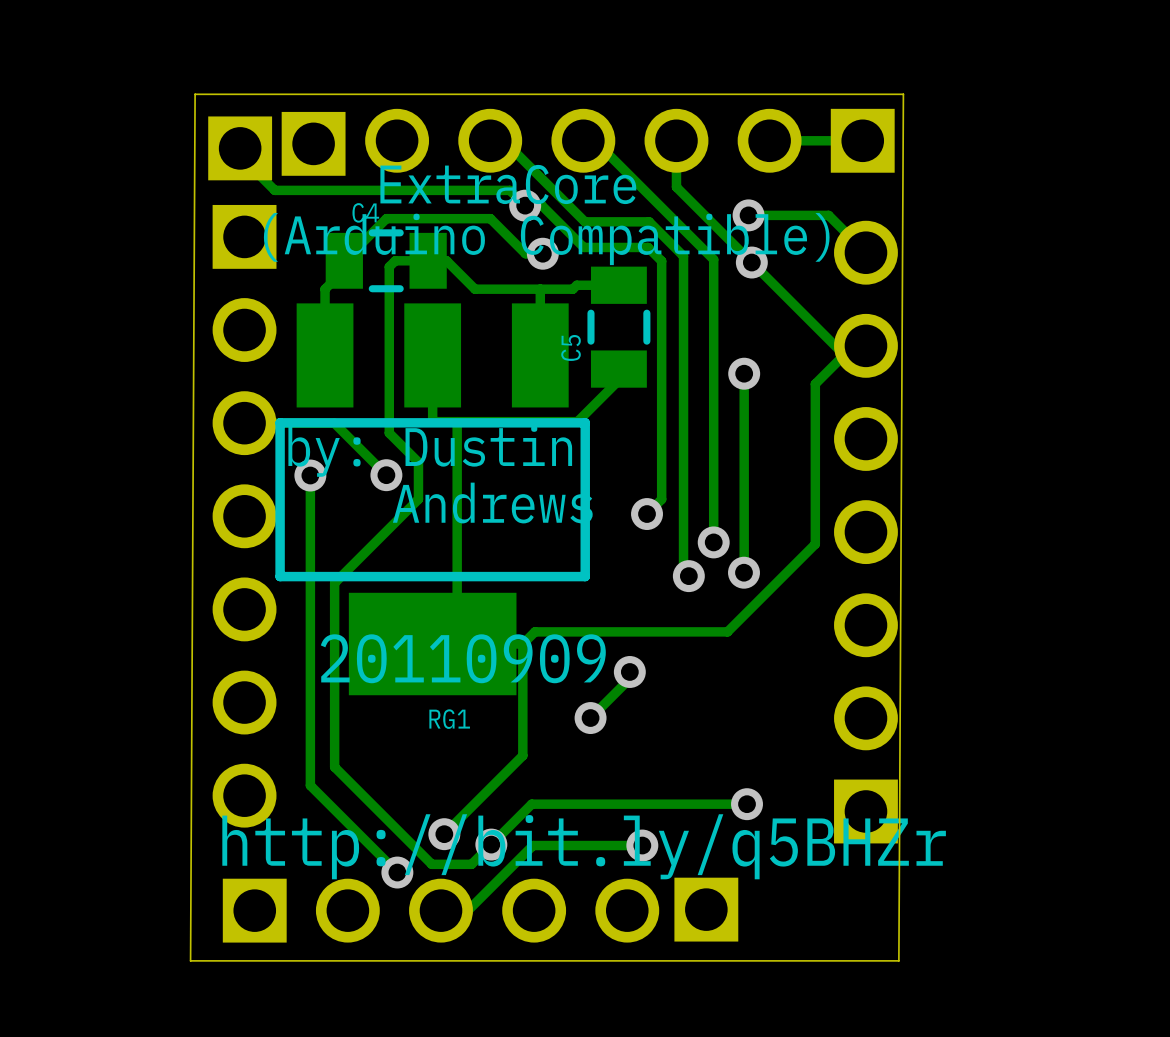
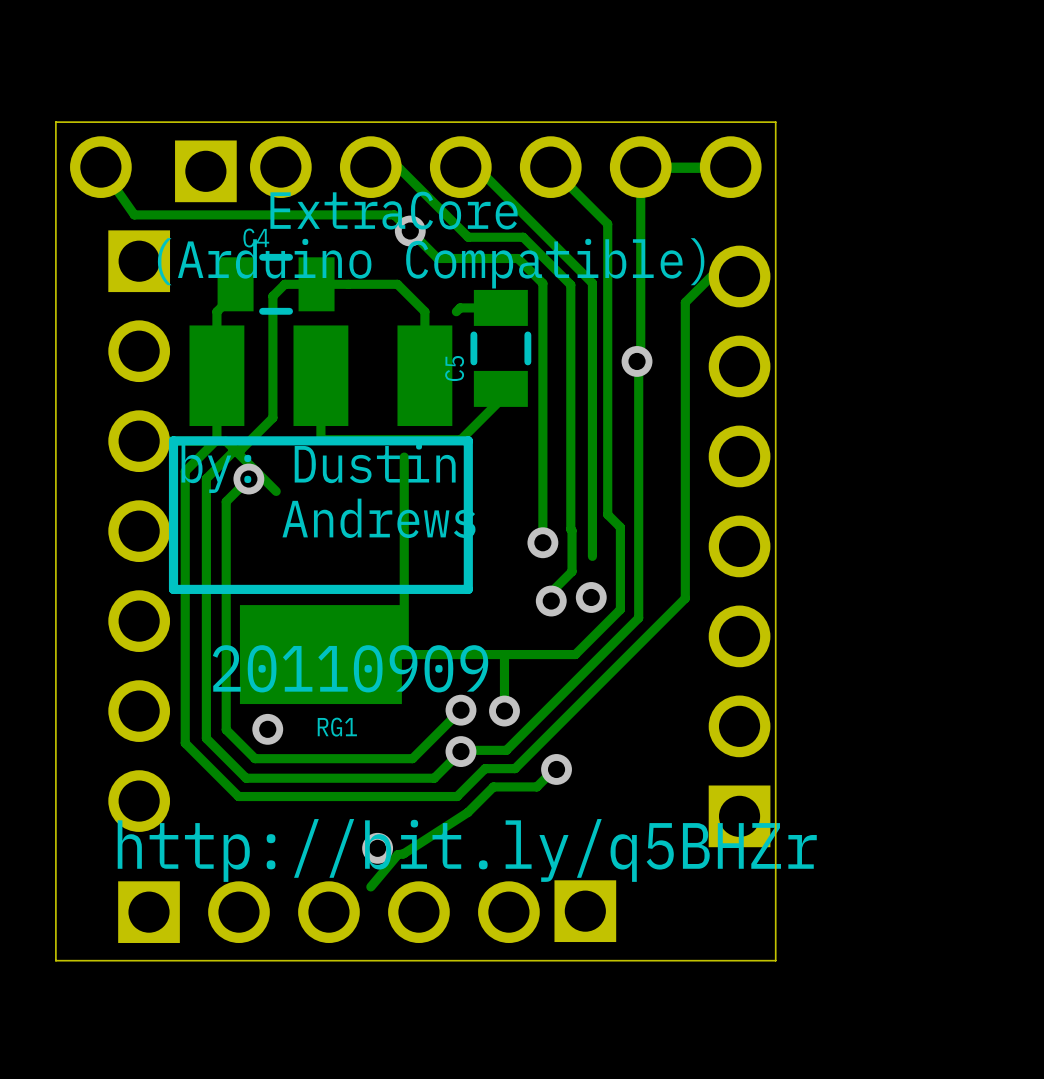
part footprint: [365, 108, 895, 173] -> [249, 136, 762, 198]
part footprint: [208, 116, 273, 181] -> [70, 136, 132, 198]
track: none -> (370, 167) (399, 168) (468, 237) (523, 237) (570, 284) (572, 571) (551, 592) (551, 601)
track: none -> (550, 167) (607, 224) (607, 514) (620, 527) (620, 609) (575, 654) (408, 654)
track: none -> (730, 167) (640, 167) (640, 357) (637, 361) (638, 363) (638, 618) (506, 750) (462, 750) (434, 778) (246, 778) (206, 738) (206, 478) (235, 449) (240, 449) (272, 417) (272, 296) (278, 290)
track: (490, 140) (503, 140) (584, 221) (649, 221) (683, 256) (683, 570) (688, 576) -> none
track: (676, 140) (676, 187) (844, 355) -> none
track: (240, 148) (240, 155) (274, 190) (509, 190) -> (100, 167) (134, 214) (395, 216)
track: (525, 205) (541, 205) (583, 247) (648, 247) (661, 261) (661, 499) (647, 514) -> (410, 231) (437, 258) (517, 258) (542, 283) (542, 542)
track: (748, 215) (828, 215) (865, 252) -> none
via: (748, 215) -> none
track: none -> (730, 257) (685, 302) (685, 598) (515, 768) (485, 768) (457, 796) (238, 796) (185, 743) (185, 471) (216, 439) (216, 375)
track: (542, 253) (525, 253) (490, 218) (386, 218) (344, 260) -> none
via: (542, 253) -> none
track: (446, 260) (474, 289) (572, 289) -> (334, 284) (397, 284) (424, 311)
via: (751, 262) -> none
track: (389, 266) (389, 433) (418, 462) (418, 499) (334, 583) -> (248, 479) (226, 501) (226, 595)
track: (865, 345) (853, 345) (815, 383) (815, 544) (727, 631) (534, 631) (522, 644) (522, 755) (444, 834) -> none
track: (744, 373) (744, 572) -> none
via position: (744, 373) -> (637, 361)
track: (457, 421) (457, 644) -> none
track: none -> (404, 457) (404, 654)
track: (310, 475) (310, 785) (397, 872) -> none
via: (310, 475) -> none
via position: (386, 475) -> (248, 479)
via position: (647, 514) -> (542, 542)
via: (713, 542) -> none
via: (743, 572) -> none
via: (688, 576) -> none
via: none -> (591, 597)
via: none -> (551, 601)
track: none -> (504, 654) (504, 711)
track: (629, 671) (629, 678) (590, 718) -> none
via position: (629, 671) -> (504, 711)
via: none -> (461, 710)
via: (590, 718) -> none
track: (334, 721) (334, 767) (431, 864) (471, 864) (531, 804) (747, 804) -> (226, 729) (255, 758) (412, 758) (461, 710)
via: none -> (267, 729)
via: none -> (460, 751)
track: none -> (556, 769) (536, 786) (493, 786) (467, 812) (403, 853) (397, 854) (370, 886)
via: none -> (556, 769)
via: (747, 804) -> none
via: (444, 834) -> none
track: (642, 845) (533, 845) (467, 910) (441, 910) -> none
via: (642, 845) -> none
via: (397, 872) -> none
board edge: (898, 960) (903, 94) (195, 94) (190, 960) -> (771, 960) (775, 960) (775, 122) (55, 122) (55, 960) (87, 960)

